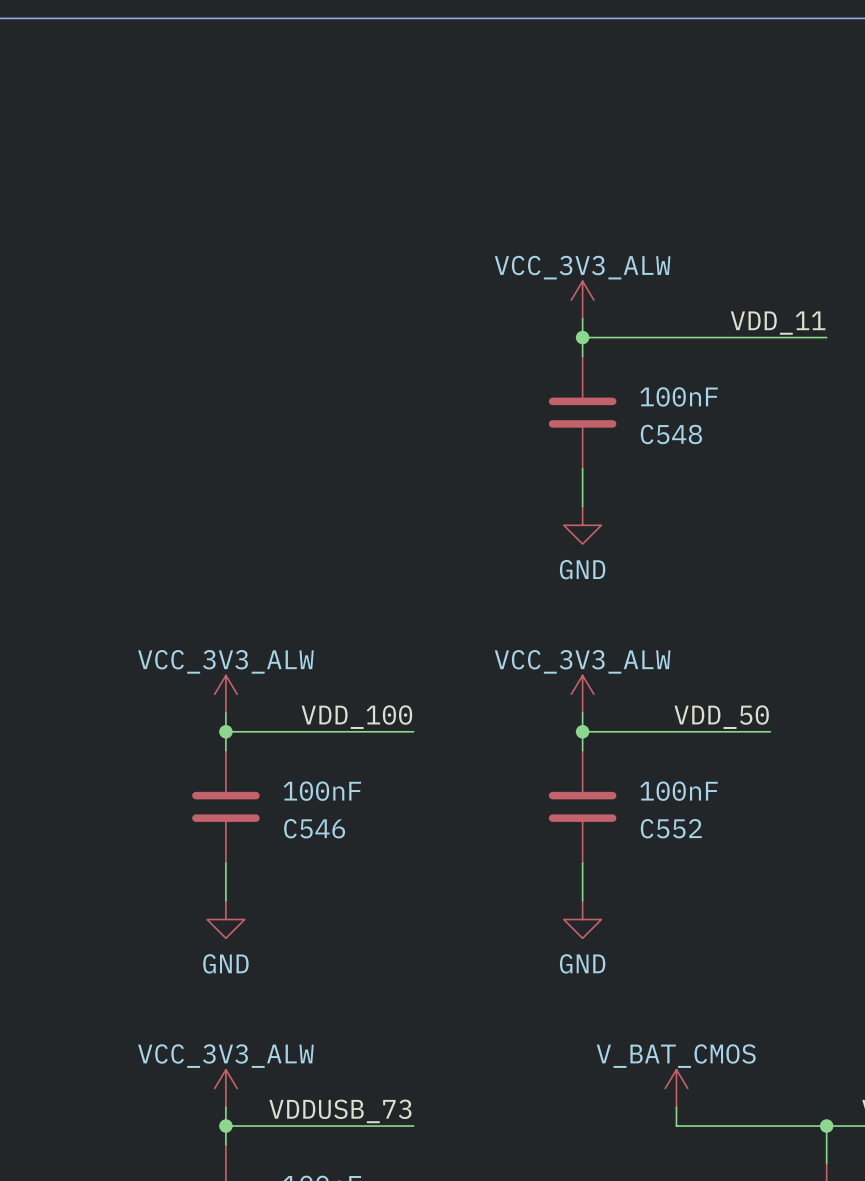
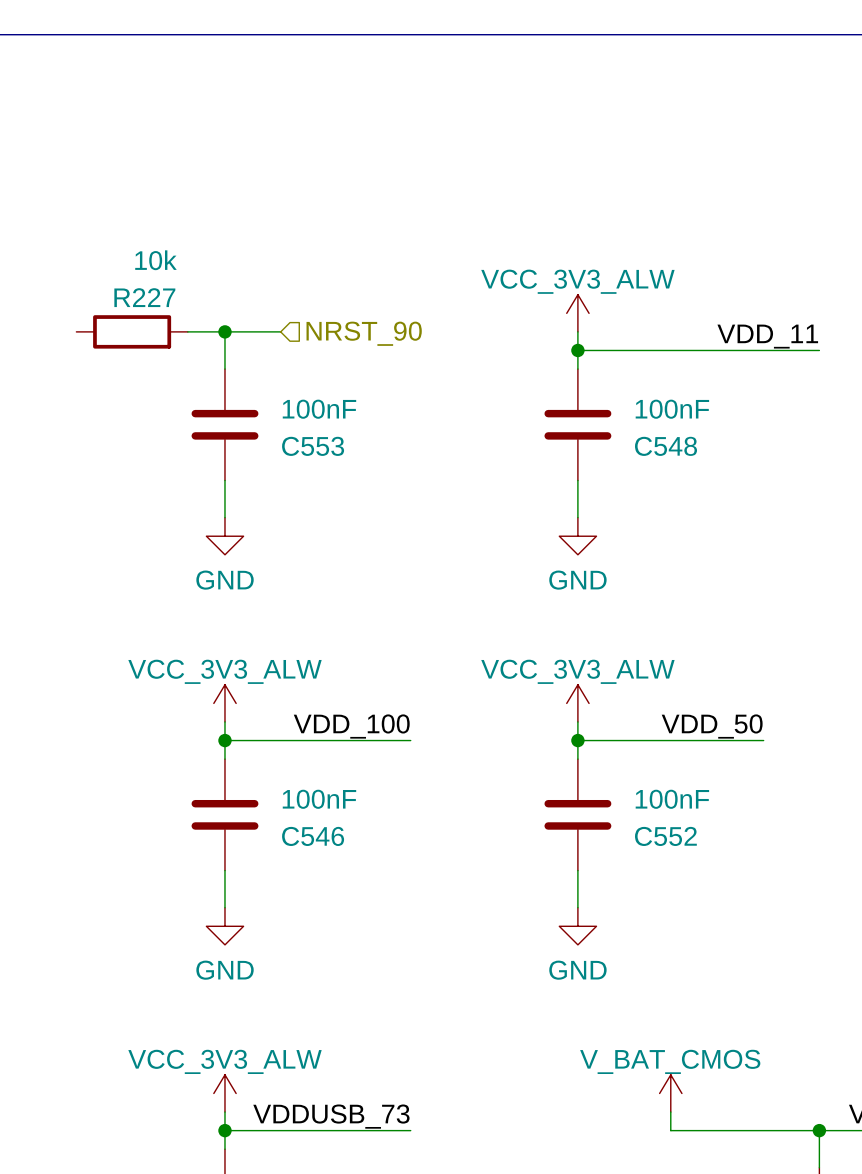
R227: none -> 10k (132, 331)
wire: none -> (187, 331) (280, 331)
wire: none -> (224, 331) (224, 369)
junction: none -> (224, 331)
hierarchical label: none -> NRST_90 (364, 333)
C553: none -> 100nF (224, 424)
wire: none -> (224, 480) (224, 517)
power symbol: none -> GND (224, 536)

